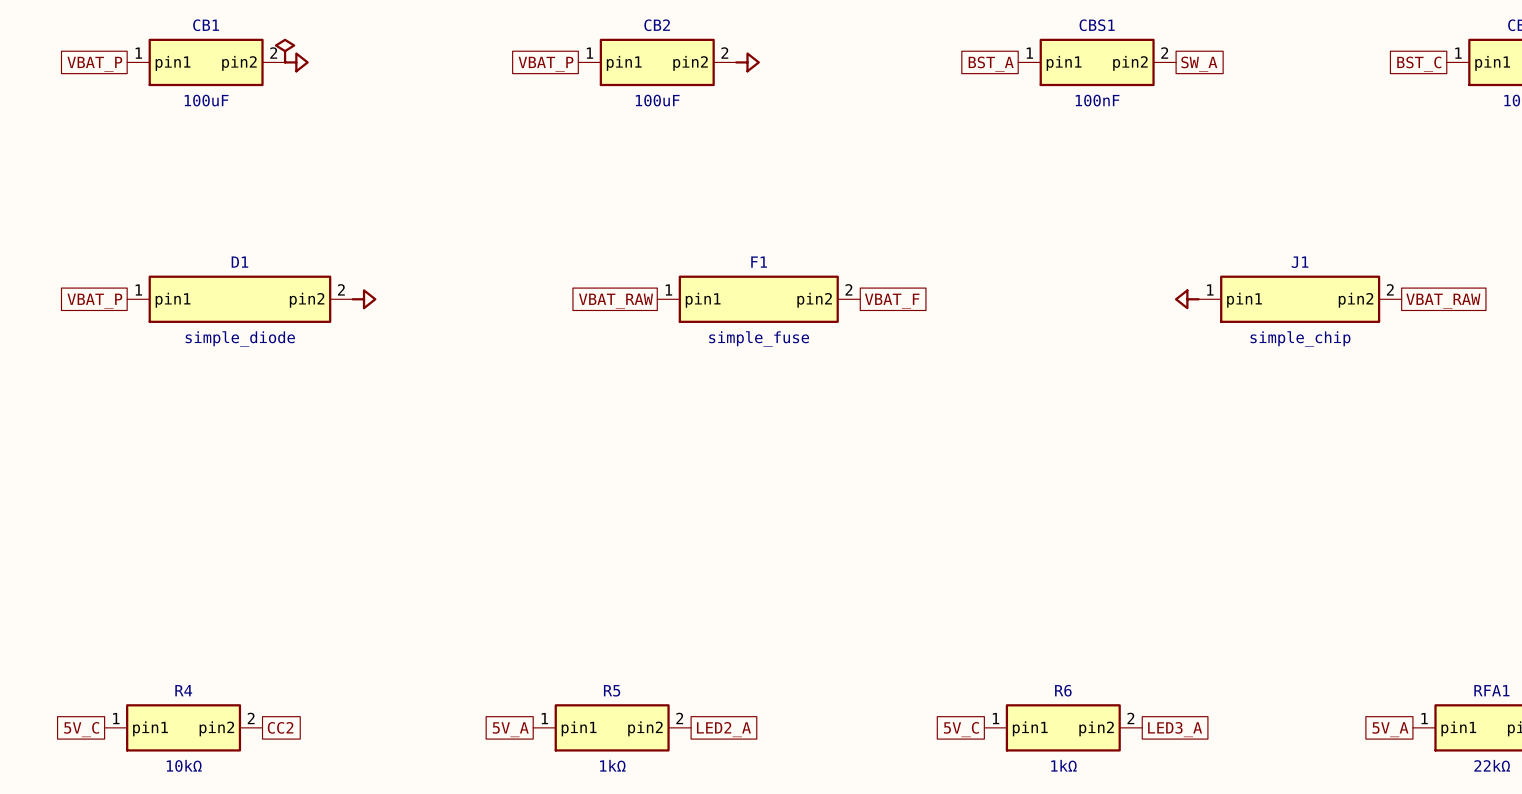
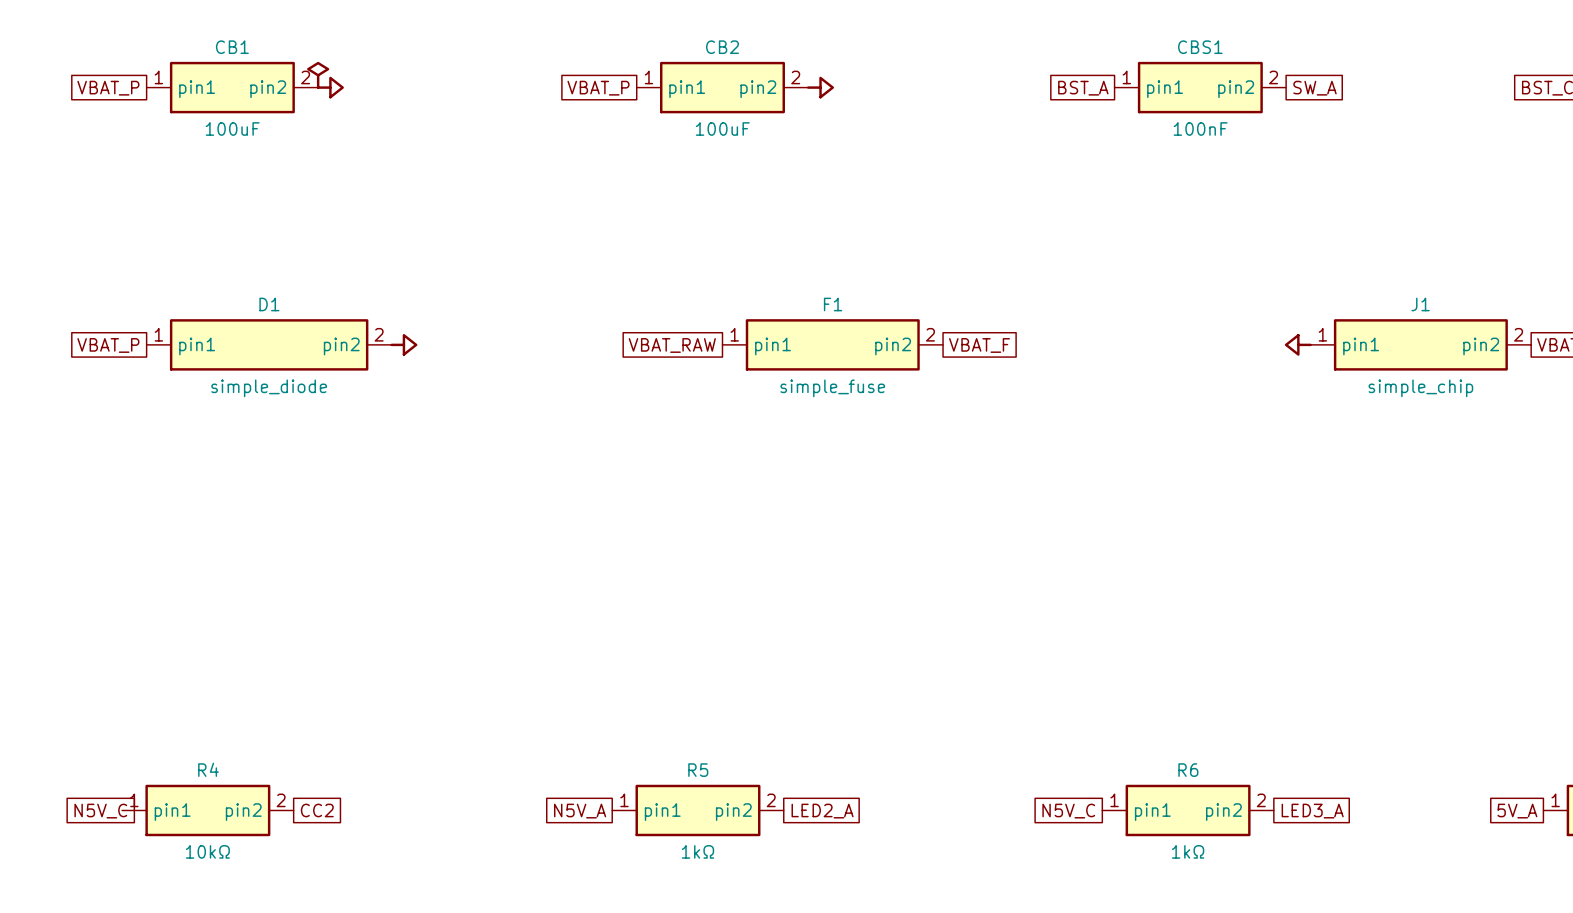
R5 position: (612, 727) -> (697, 810)
R6 position: (1063, 727) -> (1188, 810)
global label: 5V_C (81, 729) -> N5V_C (100, 811)
global label: 5V_A (510, 729) -> N5V_A (580, 811)
global label position: LED2_A (723, 729) -> LED2_A (822, 811)
global label: 5V_C (961, 729) -> N5V_C (1068, 811)
global label position: LED3_A (1175, 729) -> LED3_A (1312, 811)

